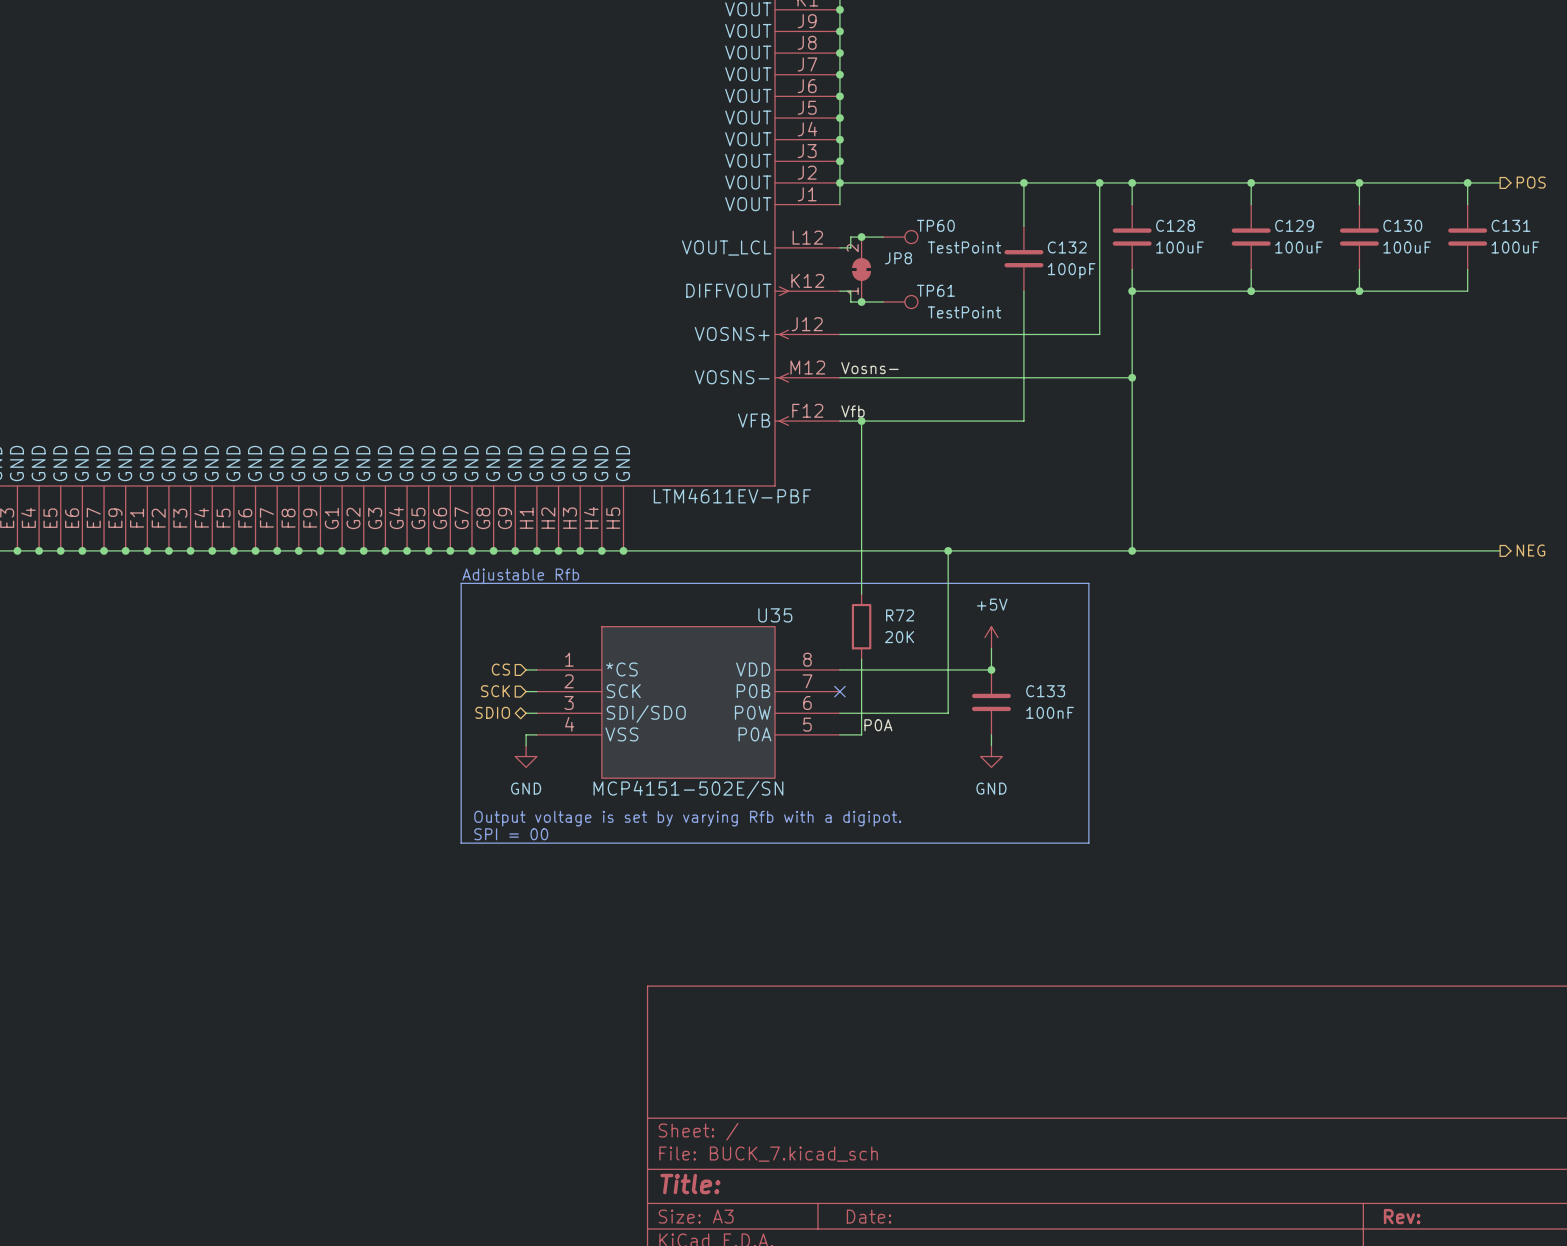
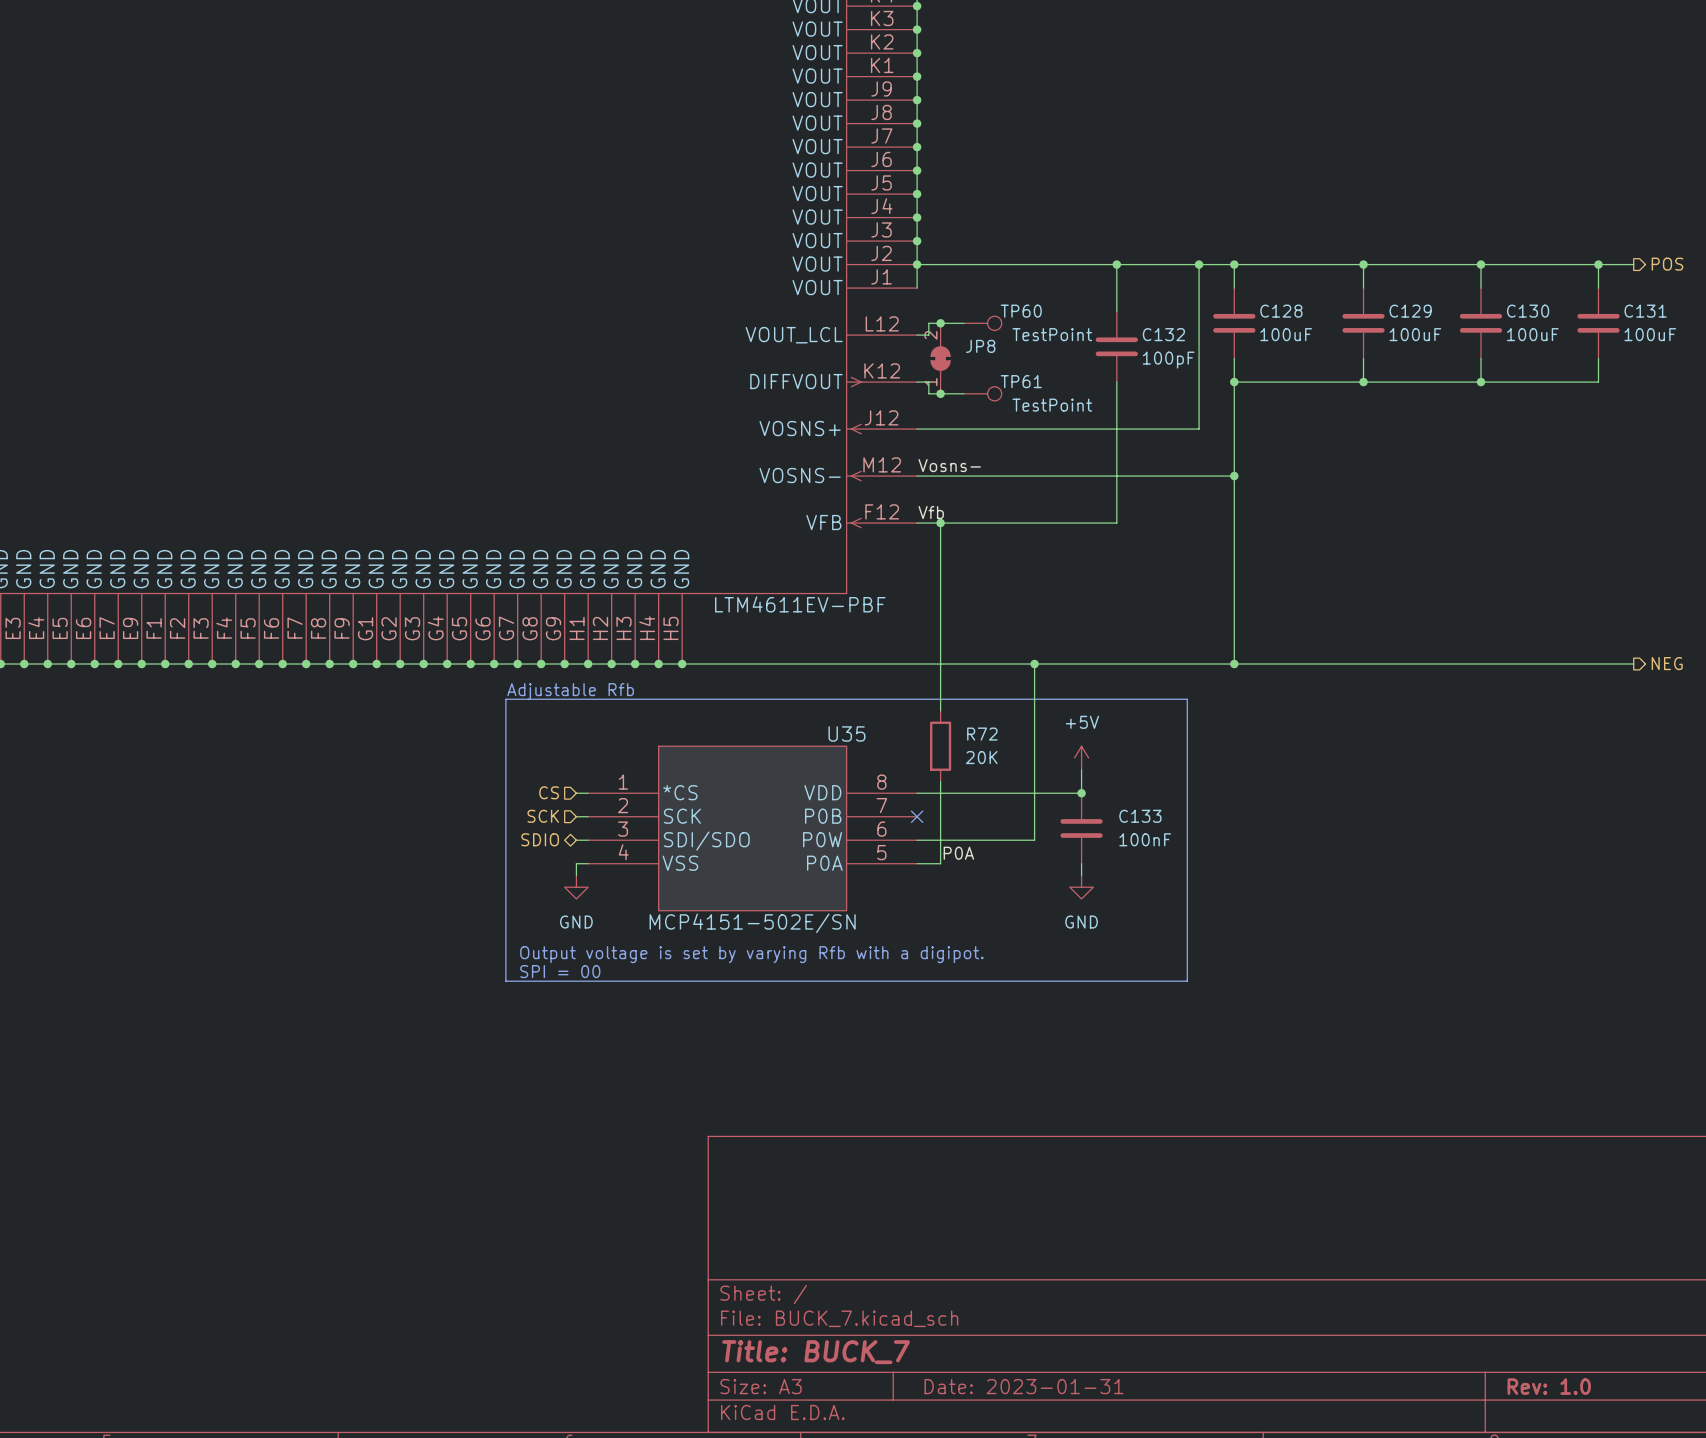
title block: Title: (690, 1184) -> Title: BUCK_7 (816, 1352)
title block: Date: (869, 1216) -> Date: 2023-01-31 (1024, 1386)
title block: Rev: (1402, 1216) -> Rev: 1.0 (1549, 1386)

